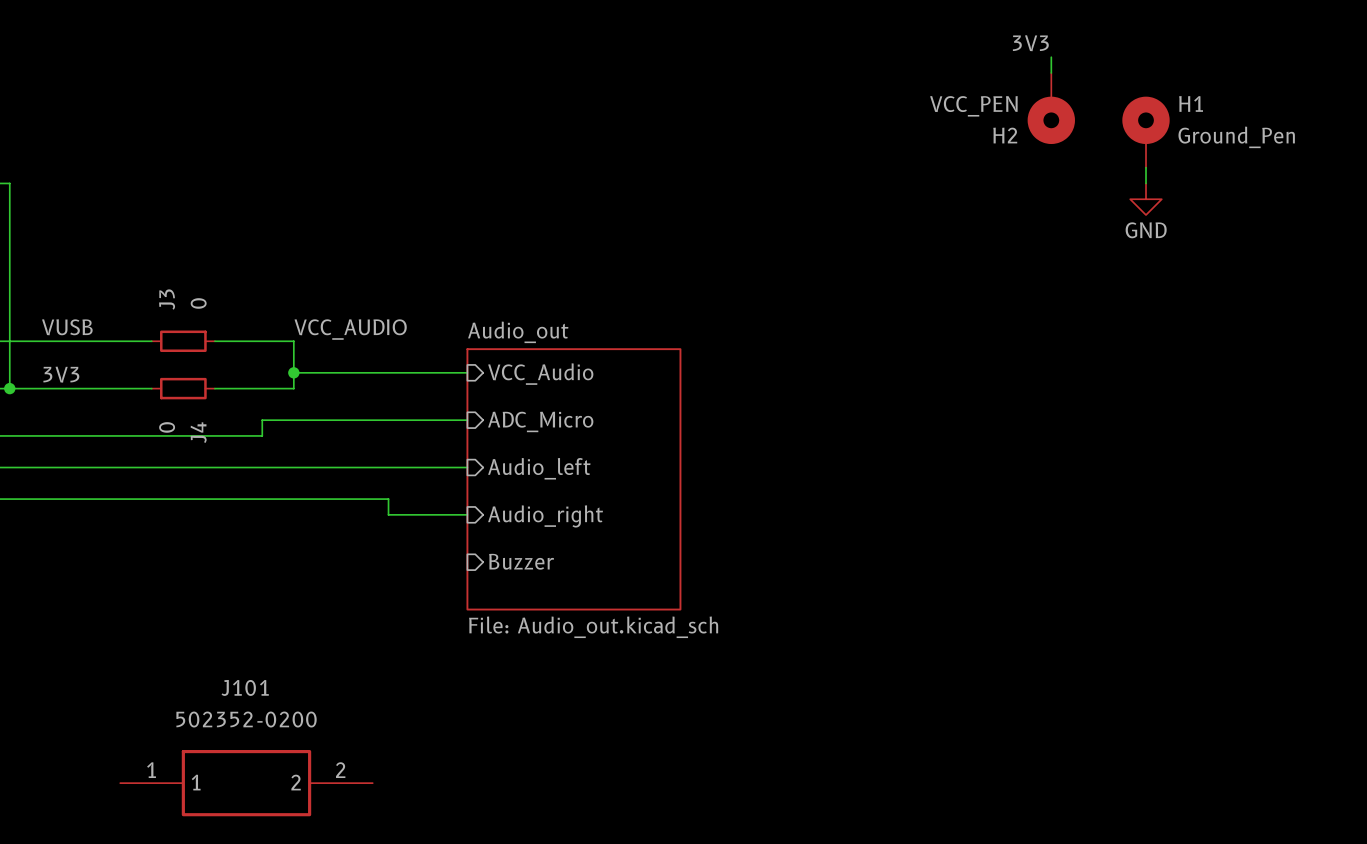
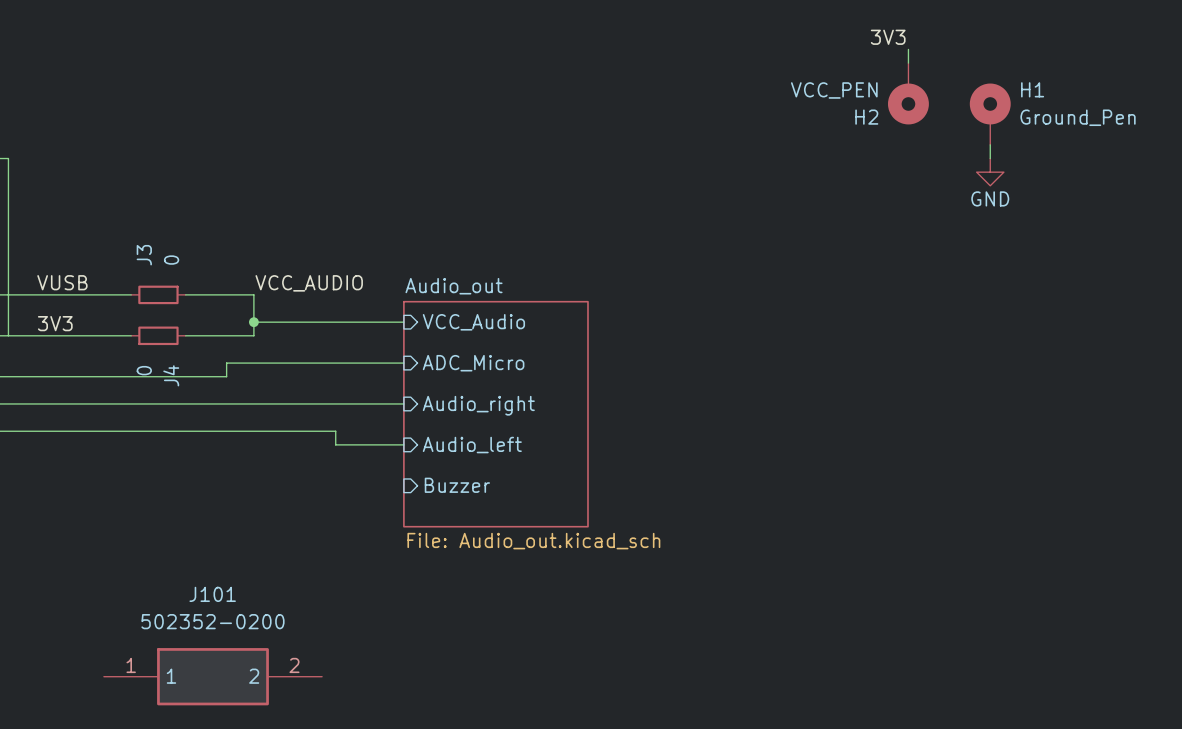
junction: (9, 388) -> none
sheet pin: Audio_left (539, 468) -> Audio_right (478, 405)
sheet pin: Audio_right (545, 516) -> Audio_left (472, 445)

